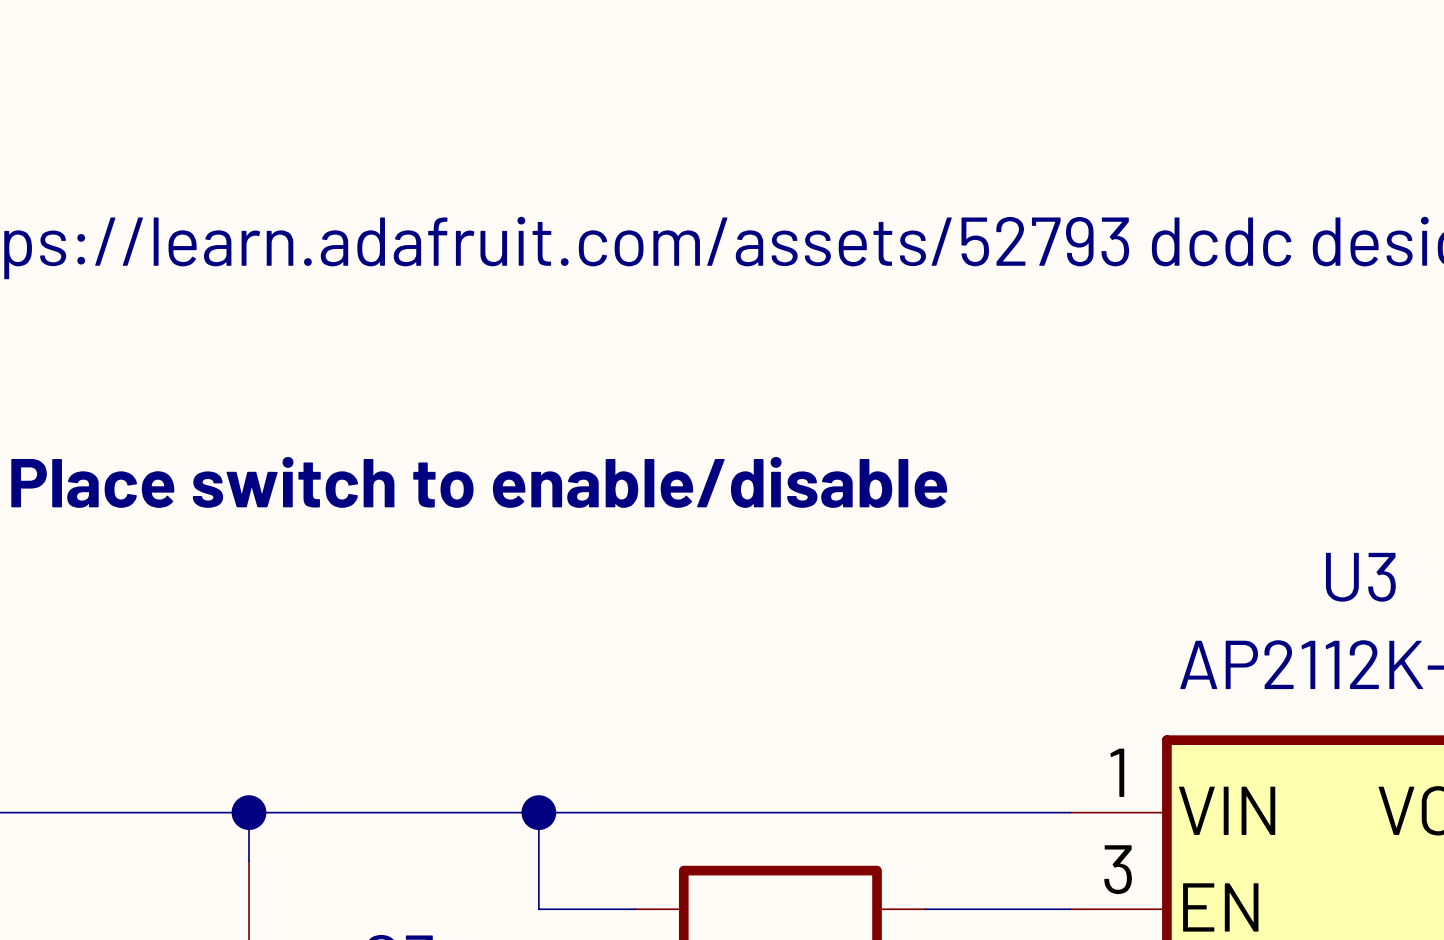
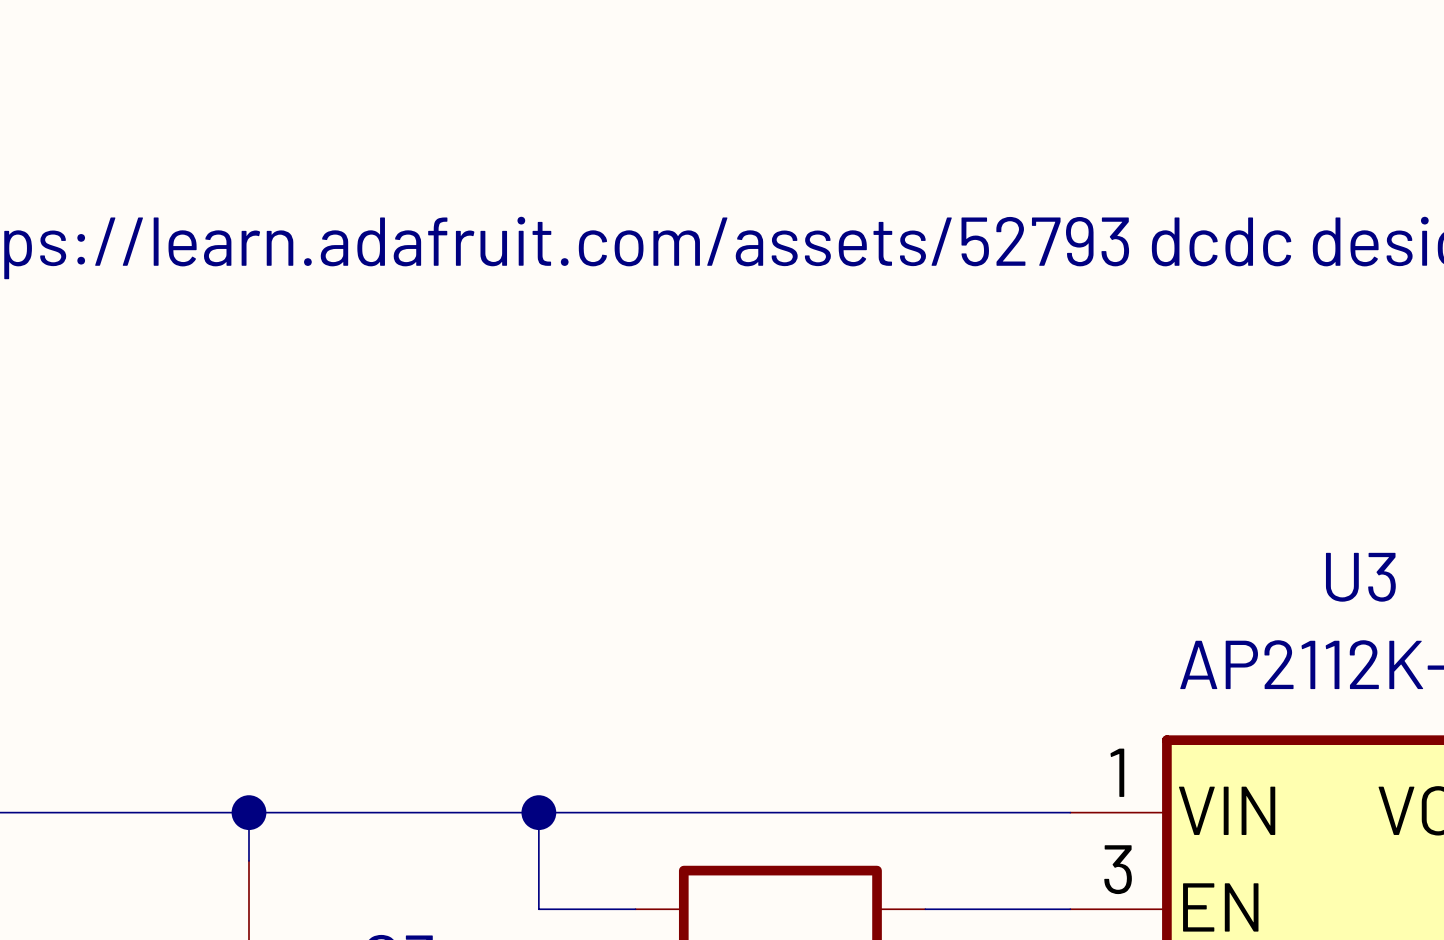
text: Place switch to enable/disable (479, 482) -> none

